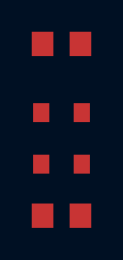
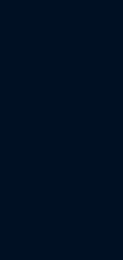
part: (61, 43) -> none
part: (61, 112) -> none
part: (61, 164) -> none
part: (61, 215) -> none

